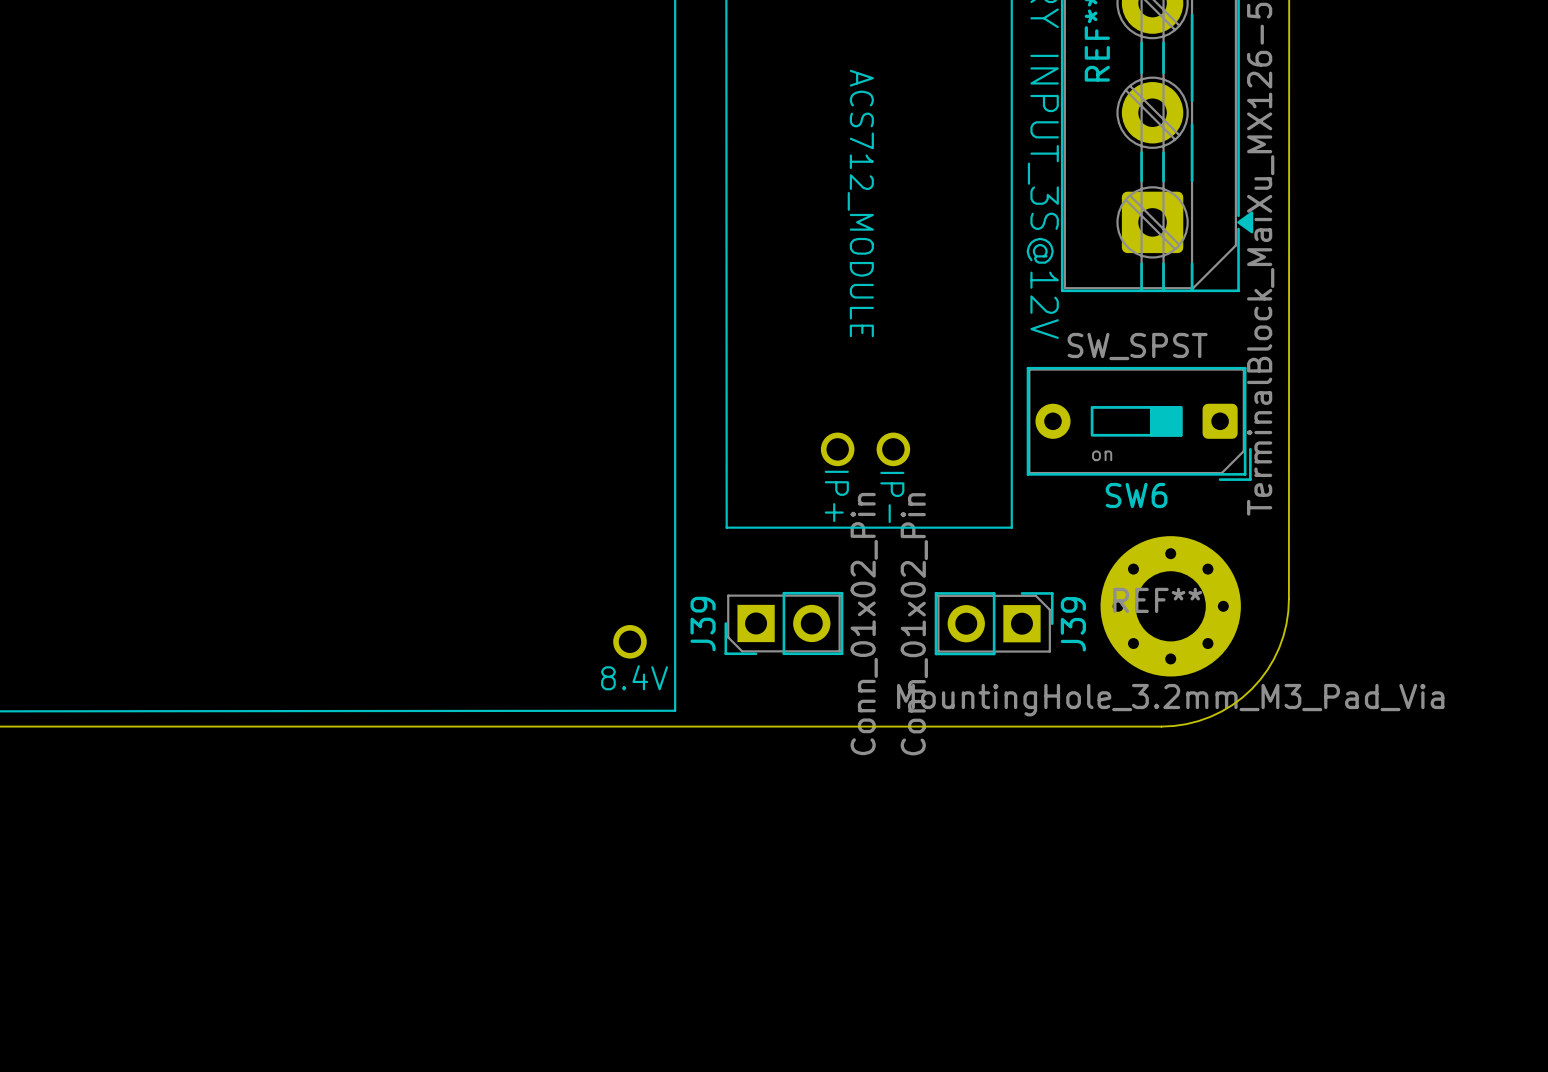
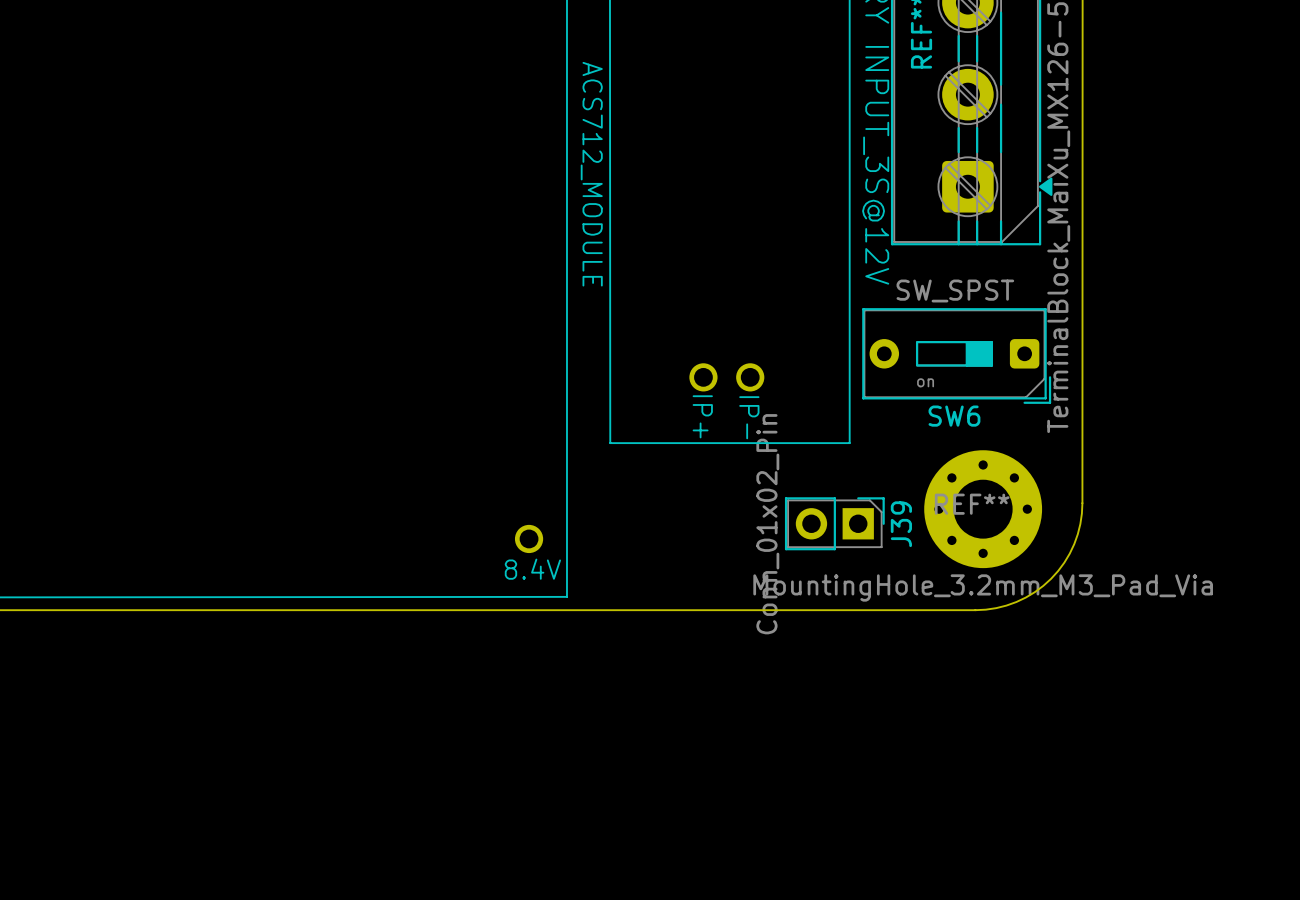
text position: ACS712_MODULE (860, 203) -> ACS712_MODULE (591, 174)
J39: Conn_01x02_Pin (783, 623) -> none

